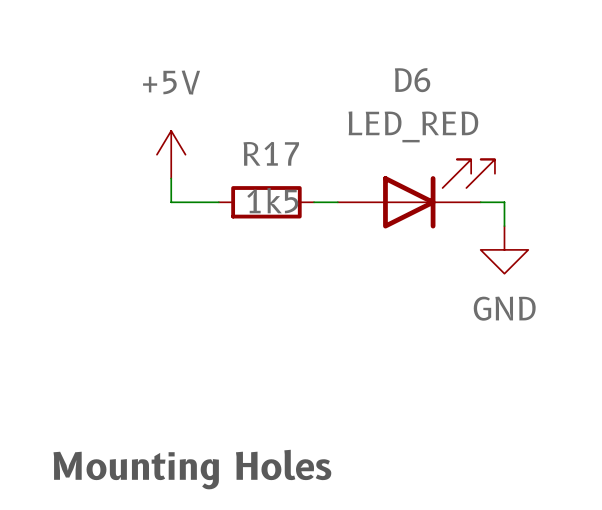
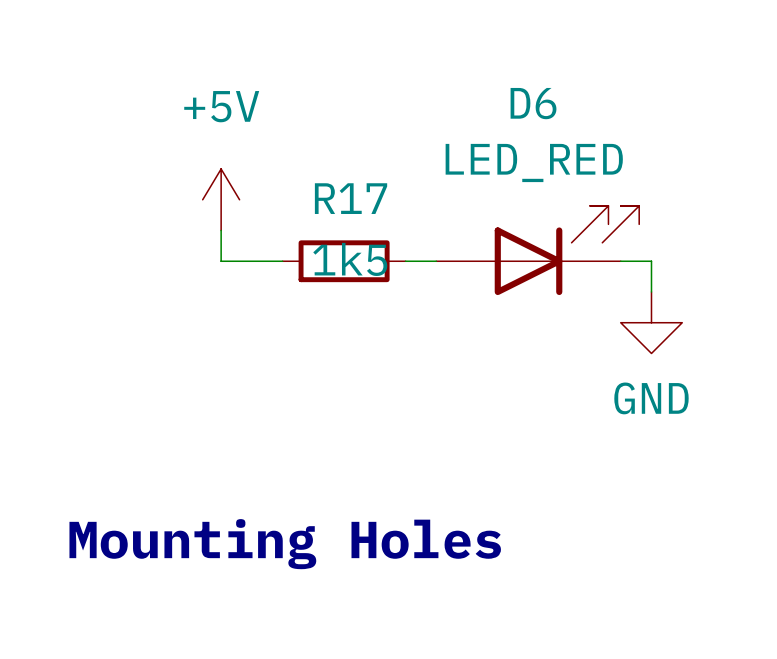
text position: Mounting Holes (192, 469) -> Mounting Holes (285, 544)

